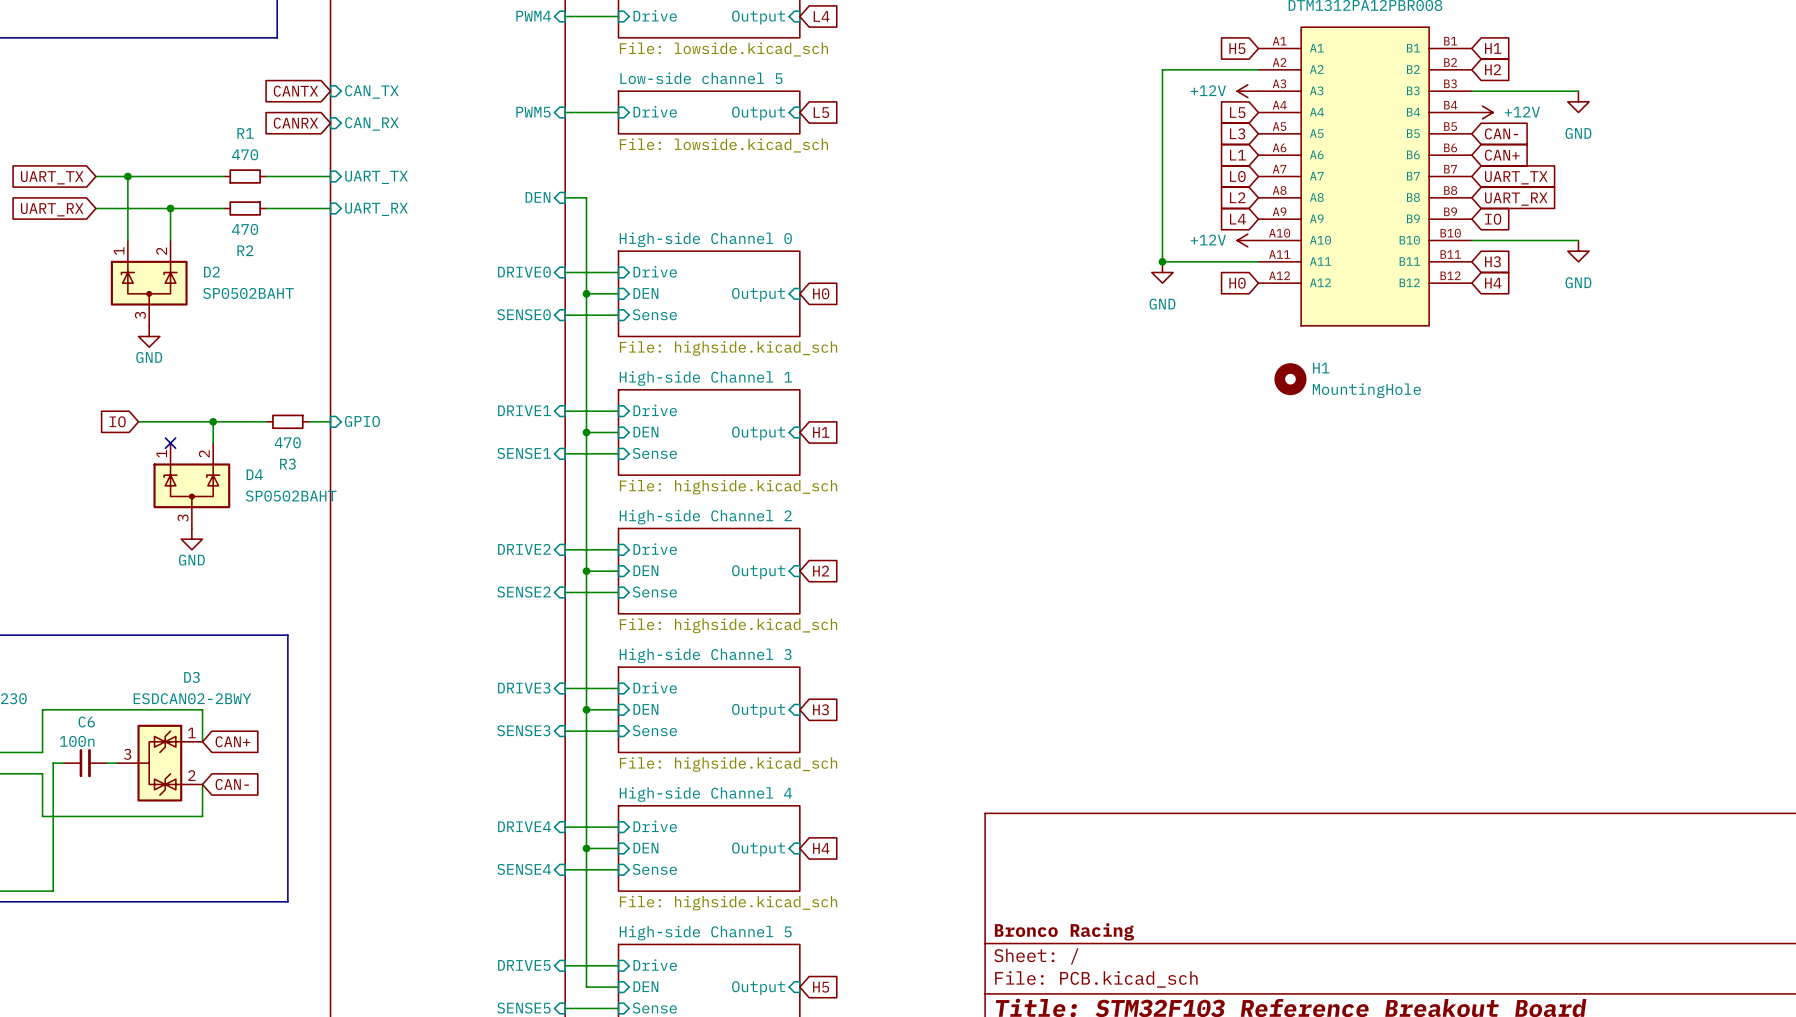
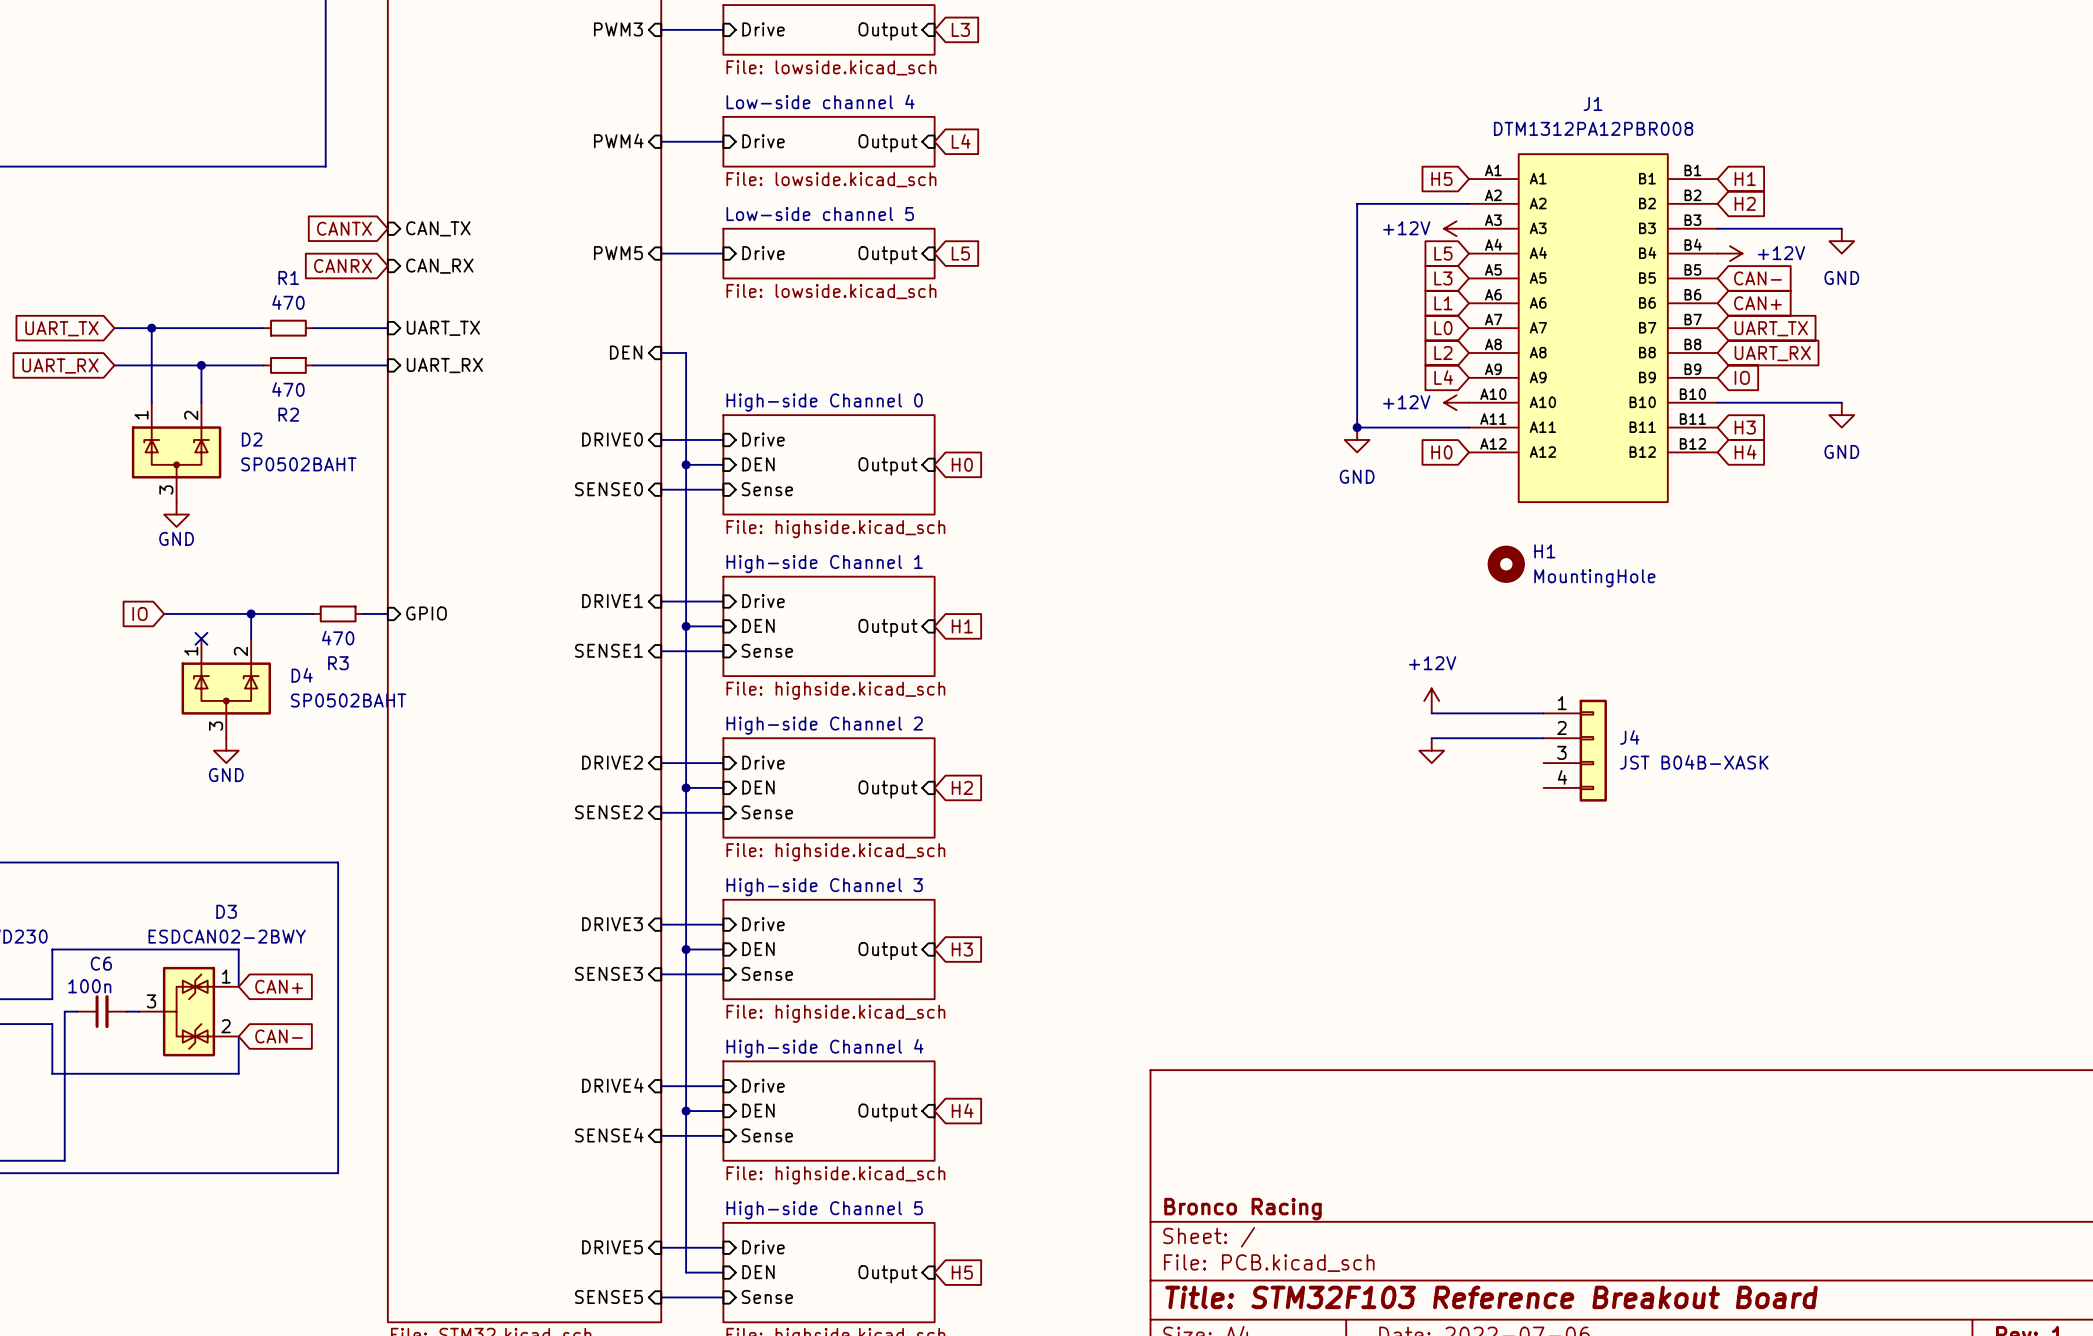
power symbol: none -> +12V (1431, 700)
wire: none -> (1431, 713) (1543, 713)
wire: none -> (1431, 738) (1543, 738)
power symbol: none -> (1431, 750)
J4: none -> JST B04B-XASK (1575, 750)

